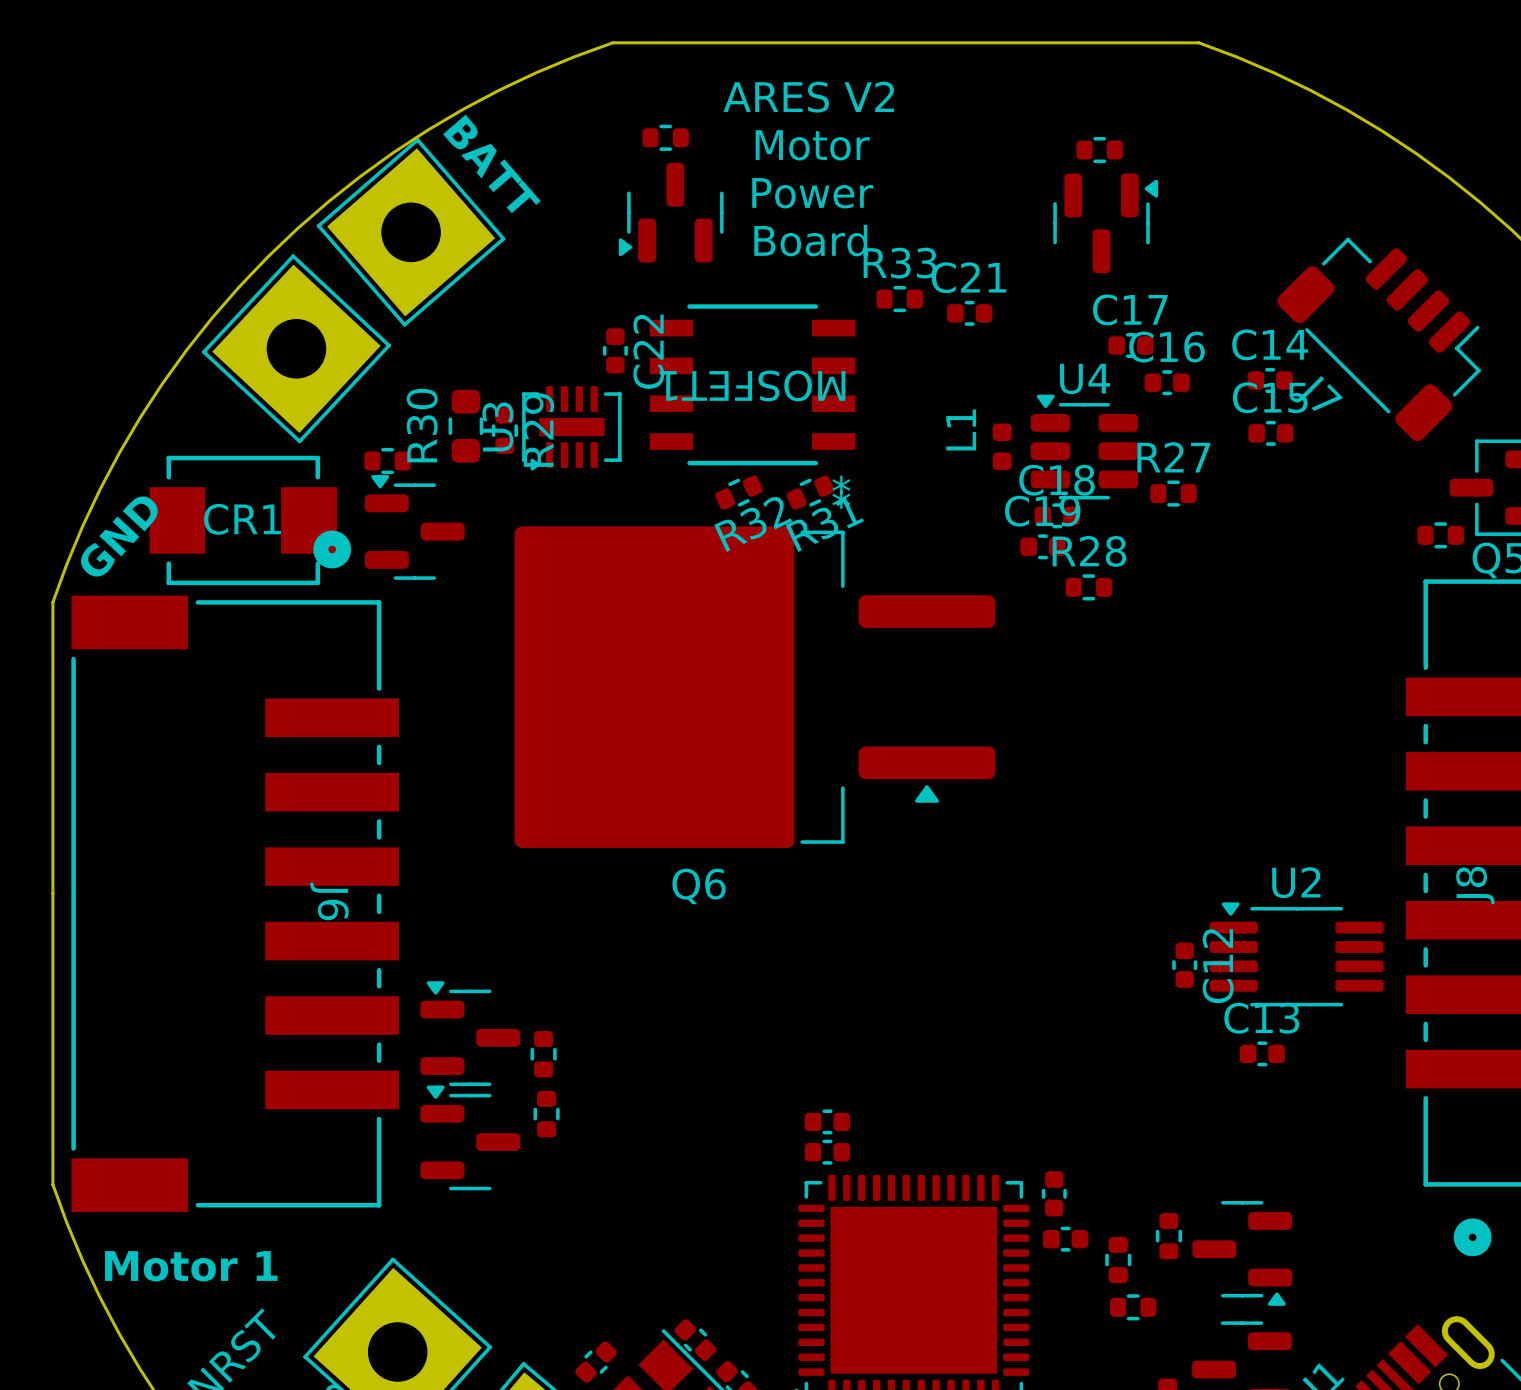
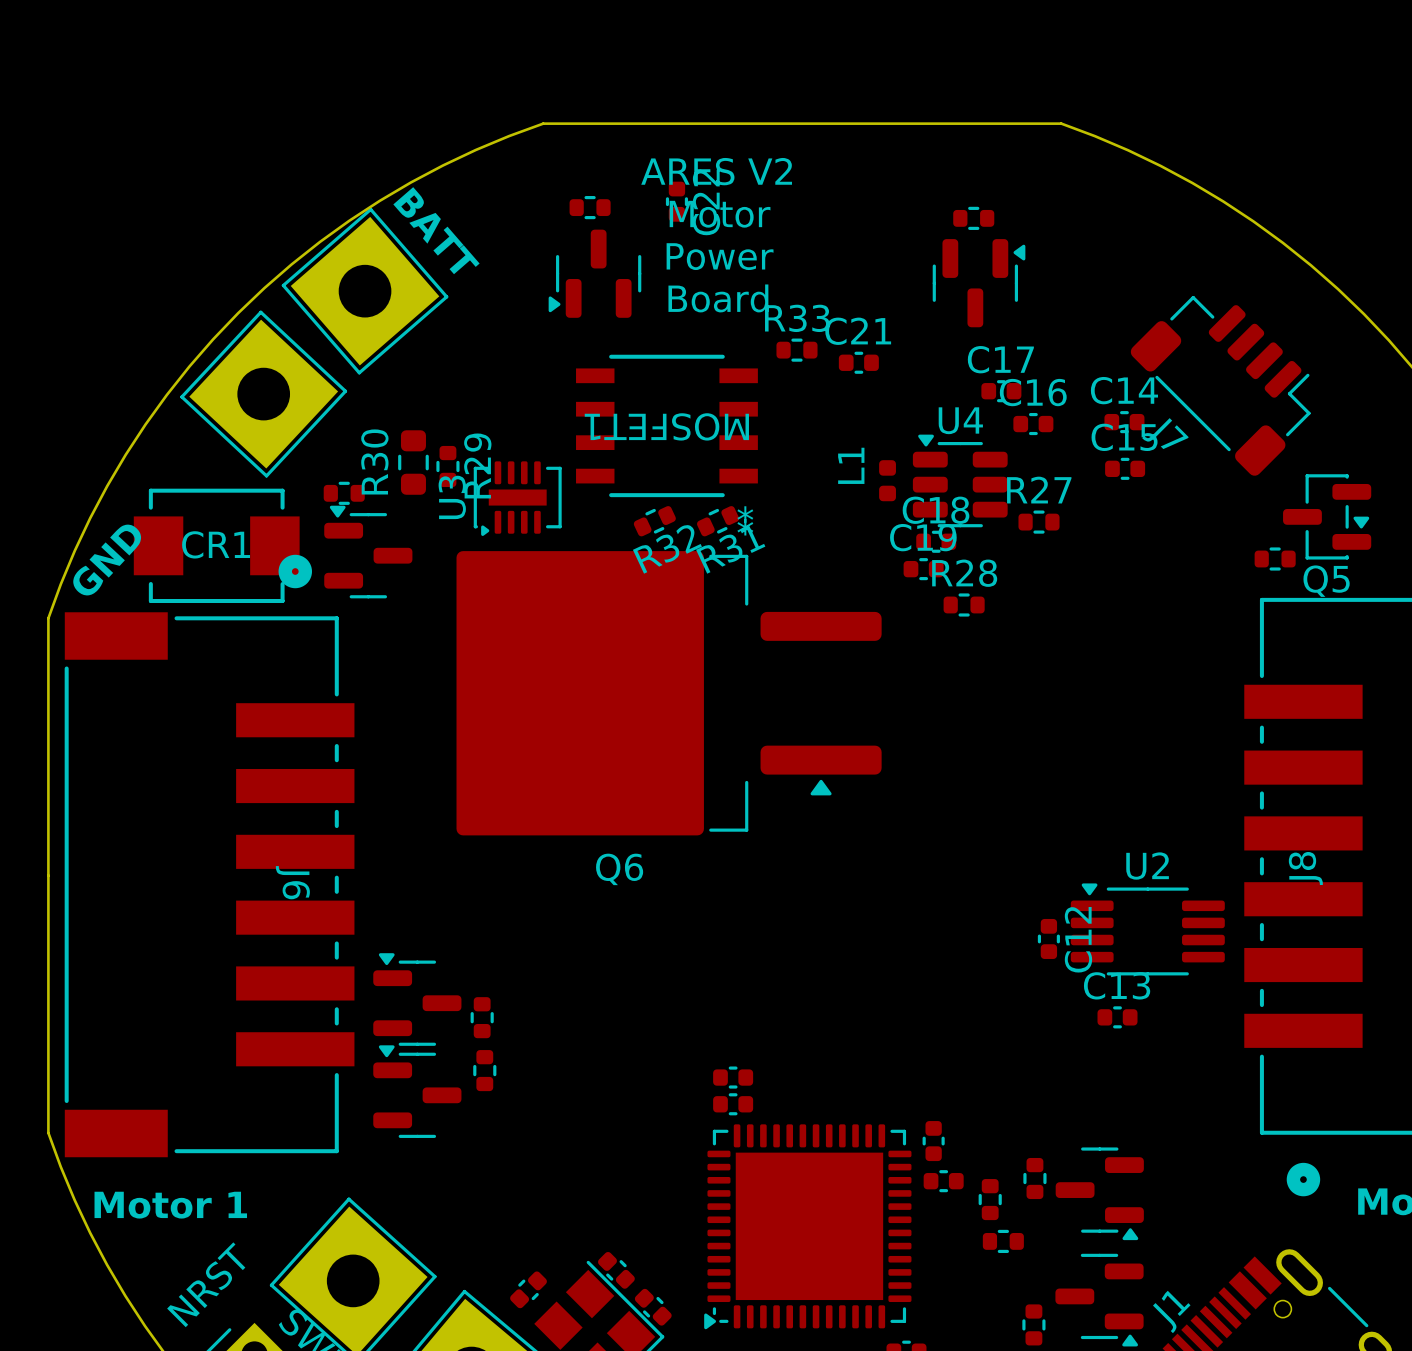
C22 position: (615, 350) -> (676, 201)
U3 position: (571, 428) -> (517, 498)

